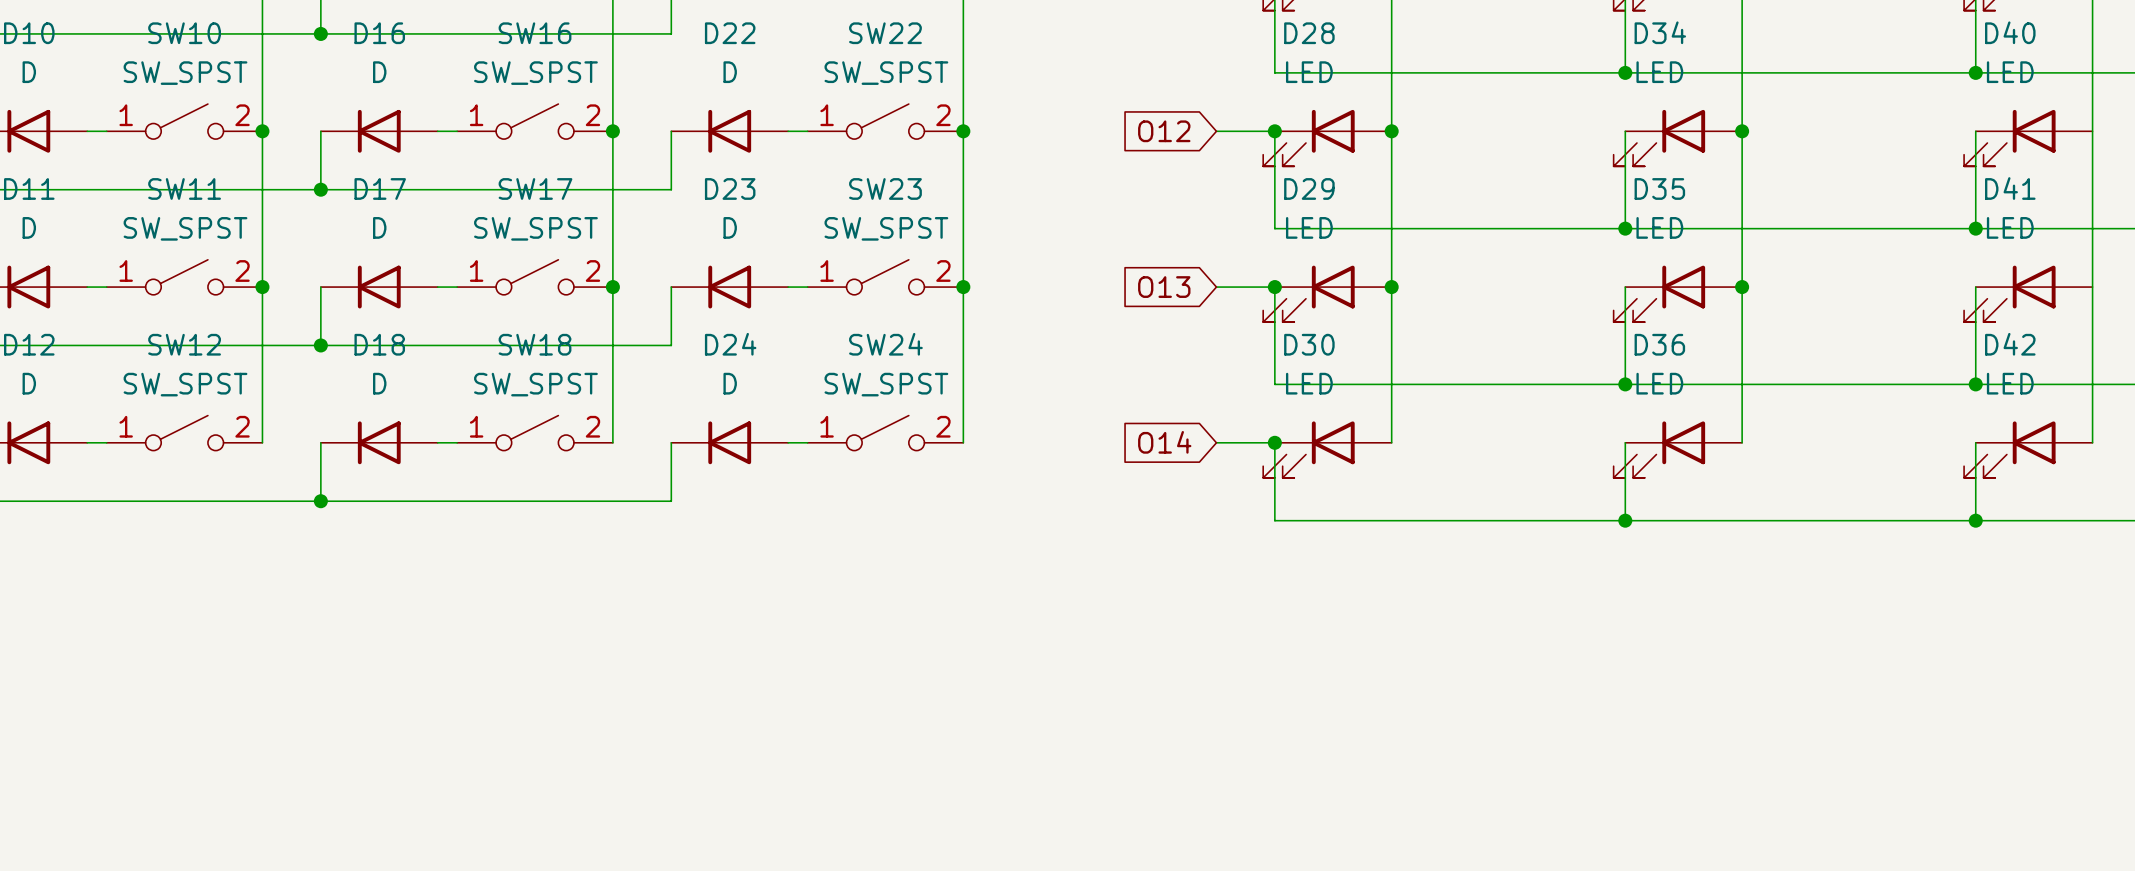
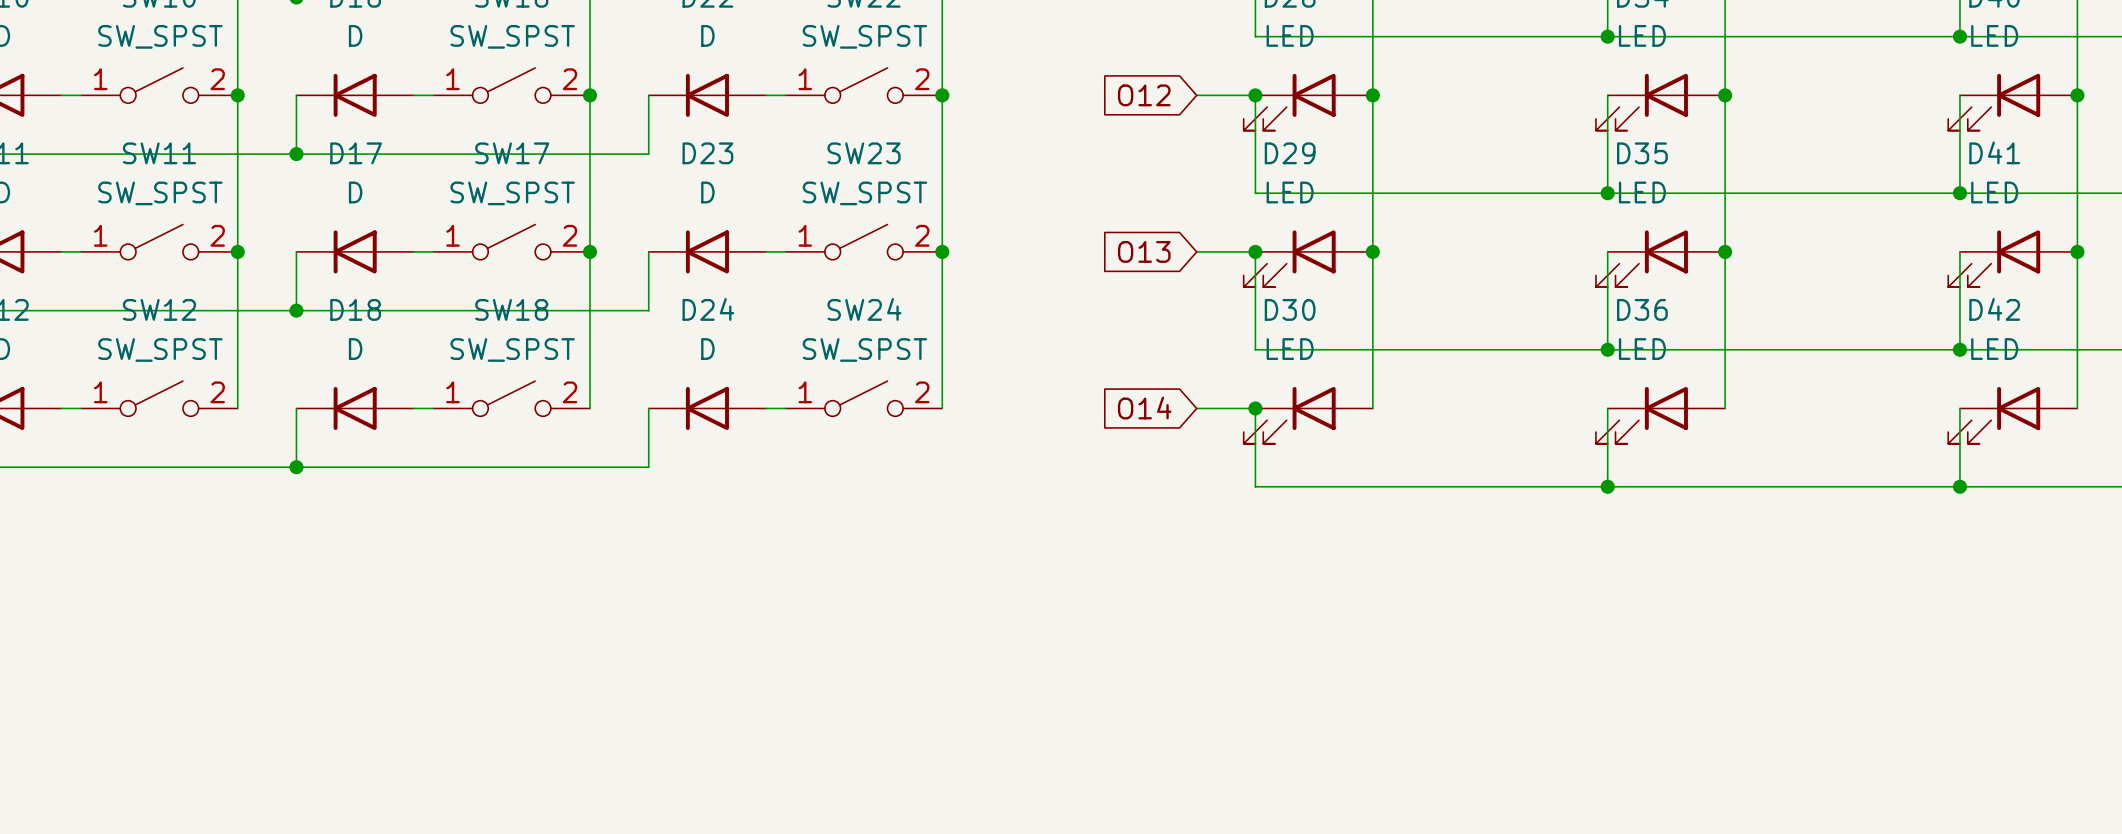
junction: none -> (2077, 95)
junction: none -> (2077, 251)

